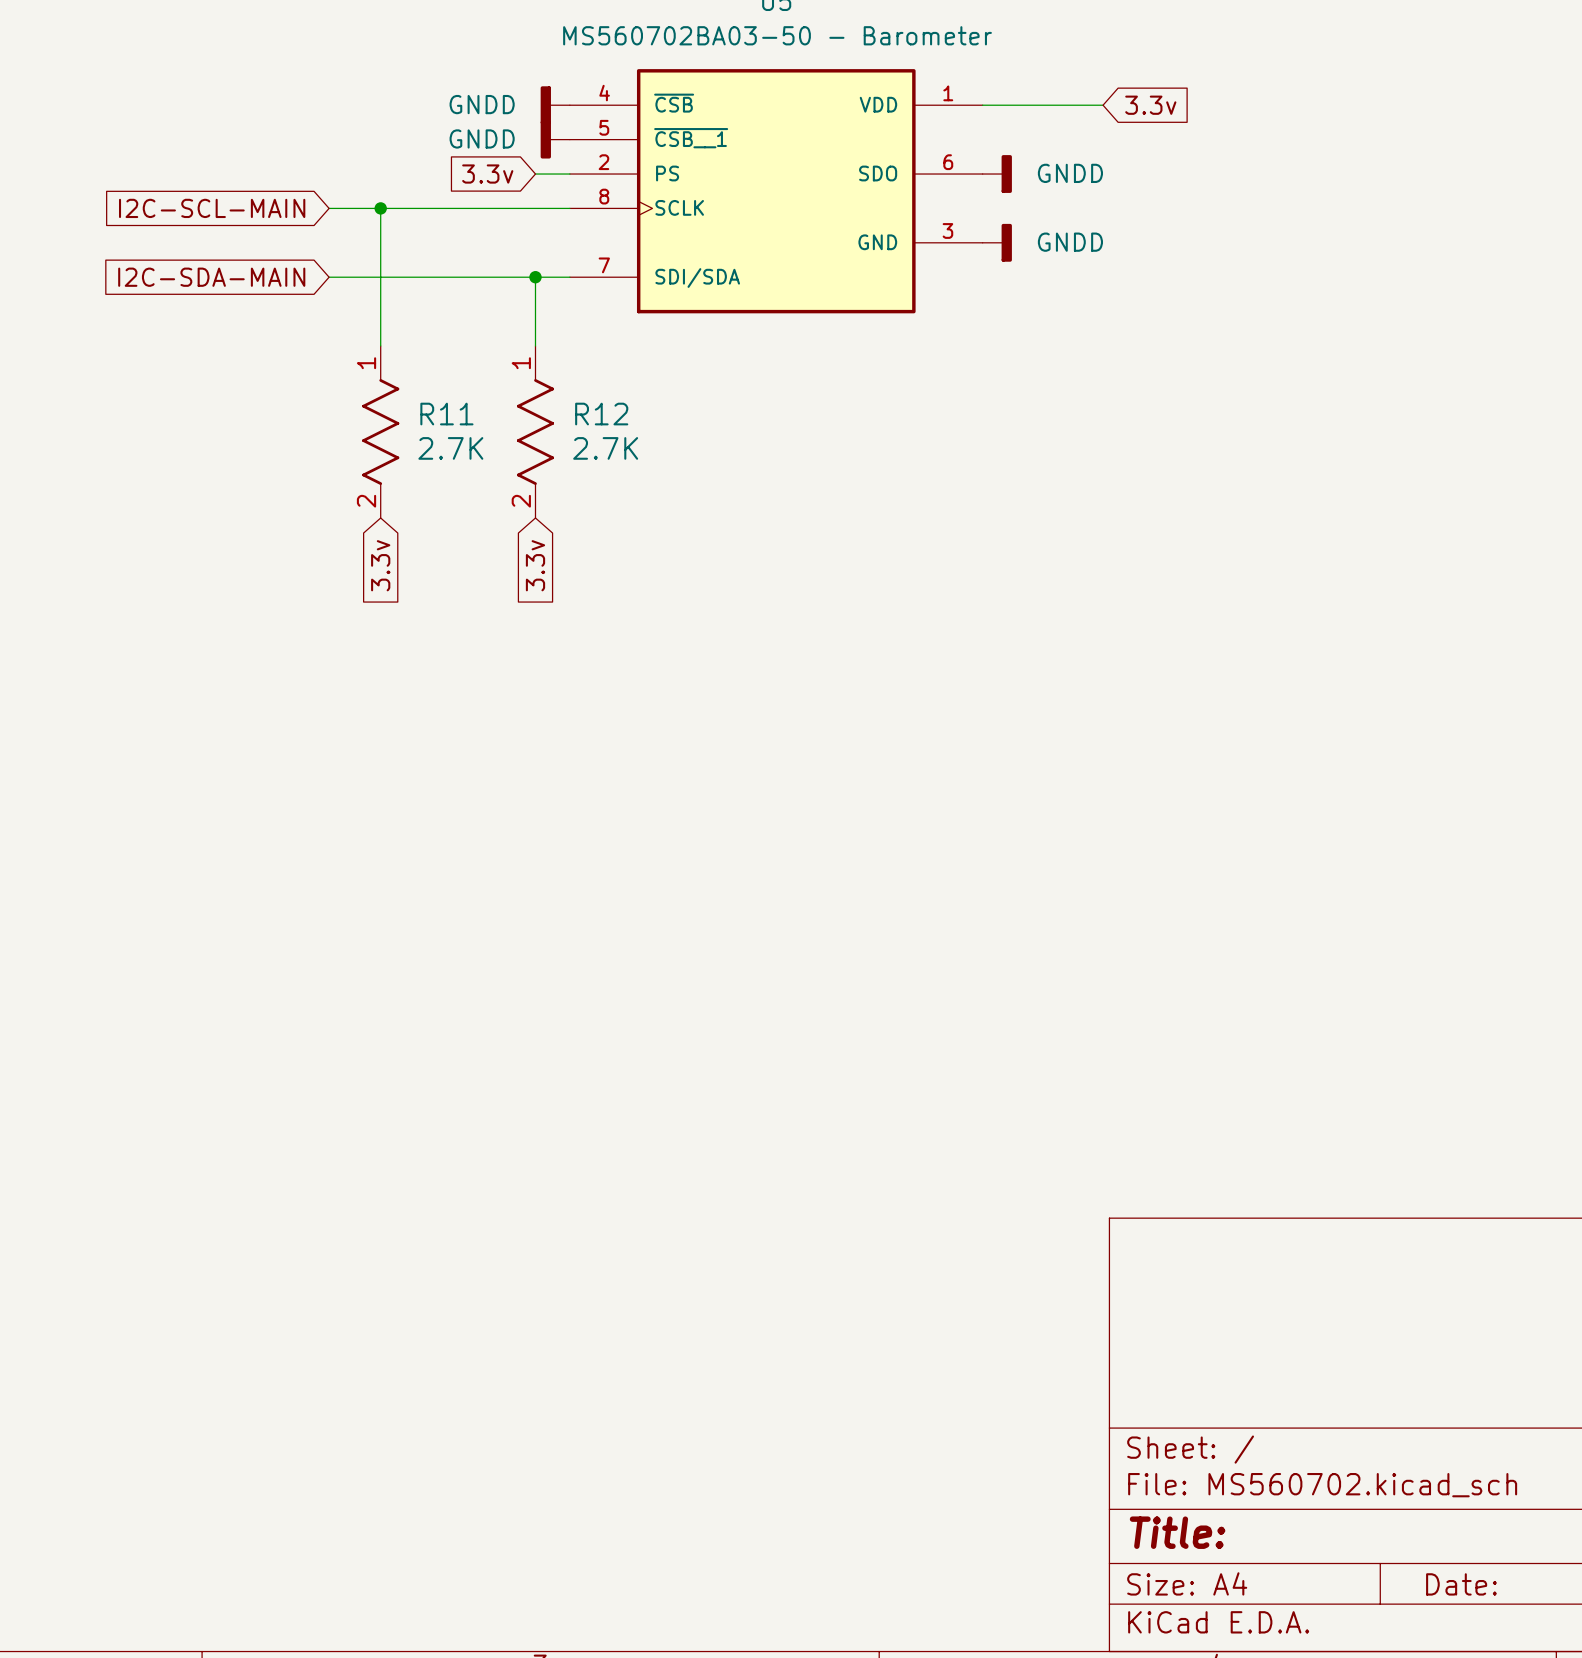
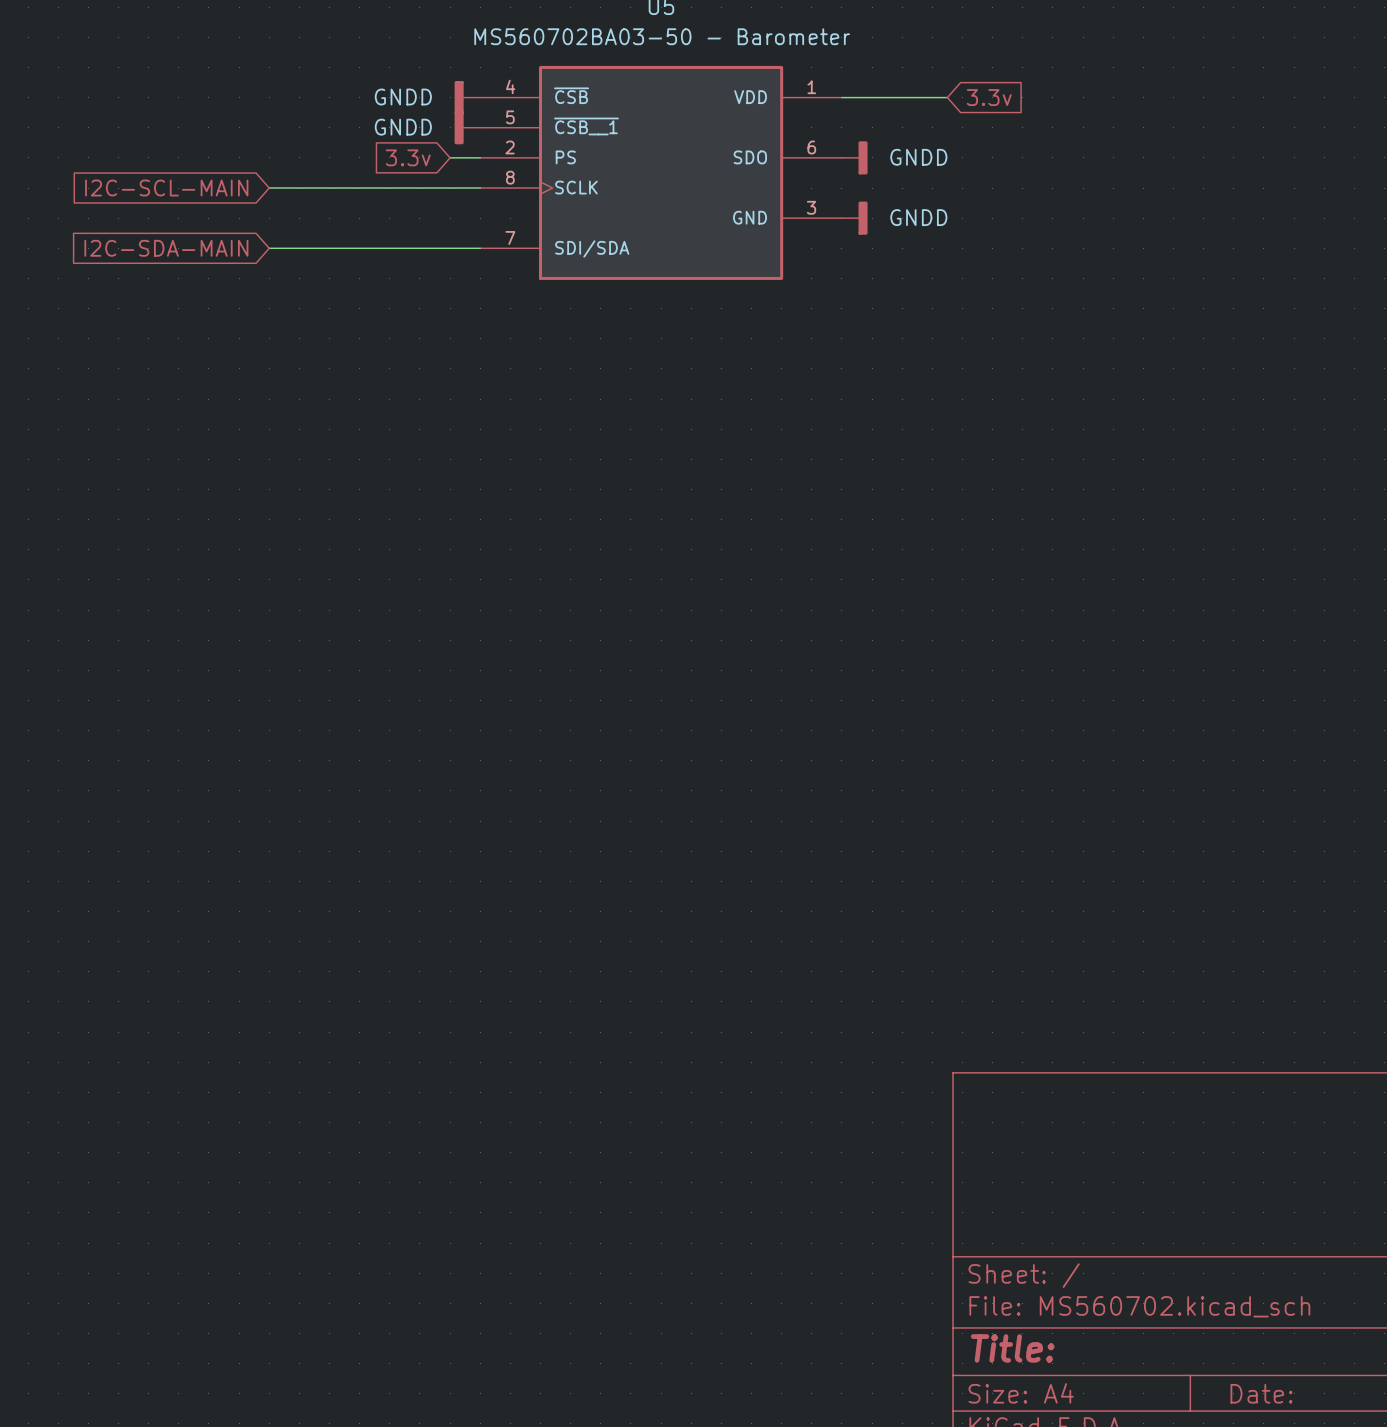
wire: (380, 208) (380, 346) -> none
junction: (380, 208) -> none
wire: (535, 277) (535, 346) -> none
junction: (535, 277) -> none
R11: 2.7K (380, 432) -> none
R12: 2.7K (535, 432) -> none
global label: 3.3v (380, 565) -> none
global label: 3.3v (535, 565) -> none

